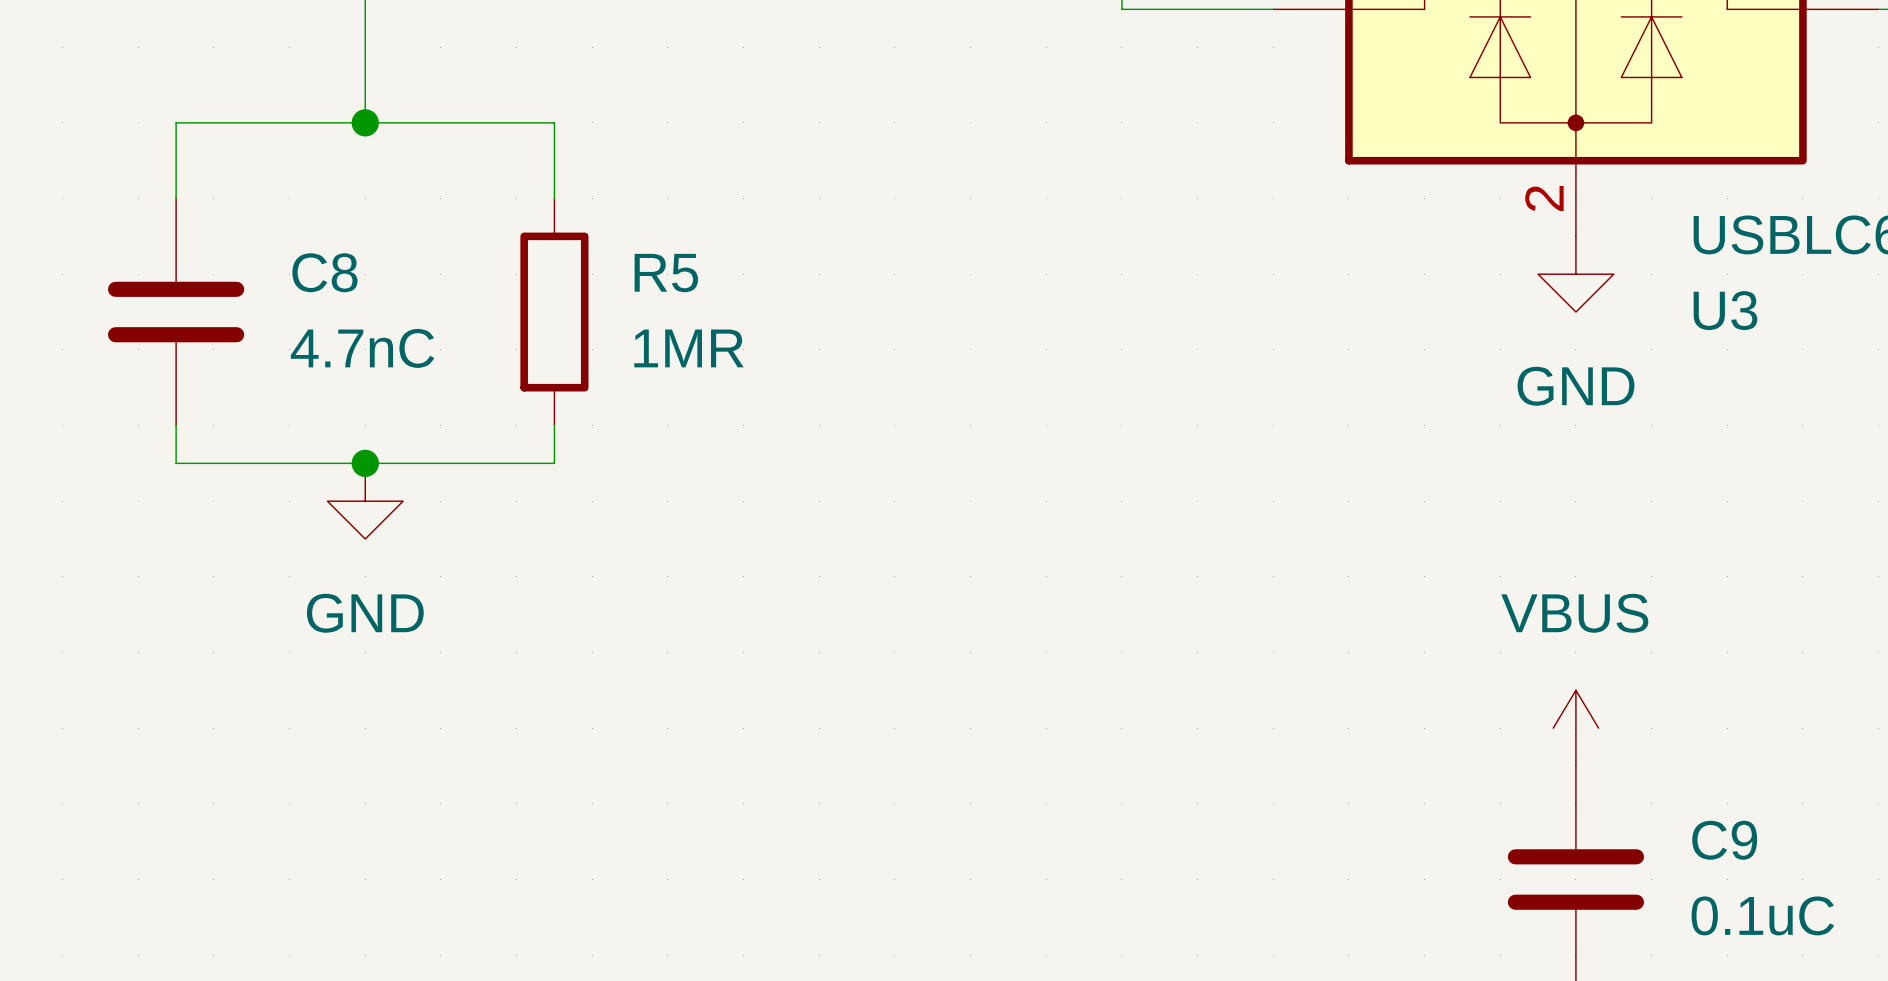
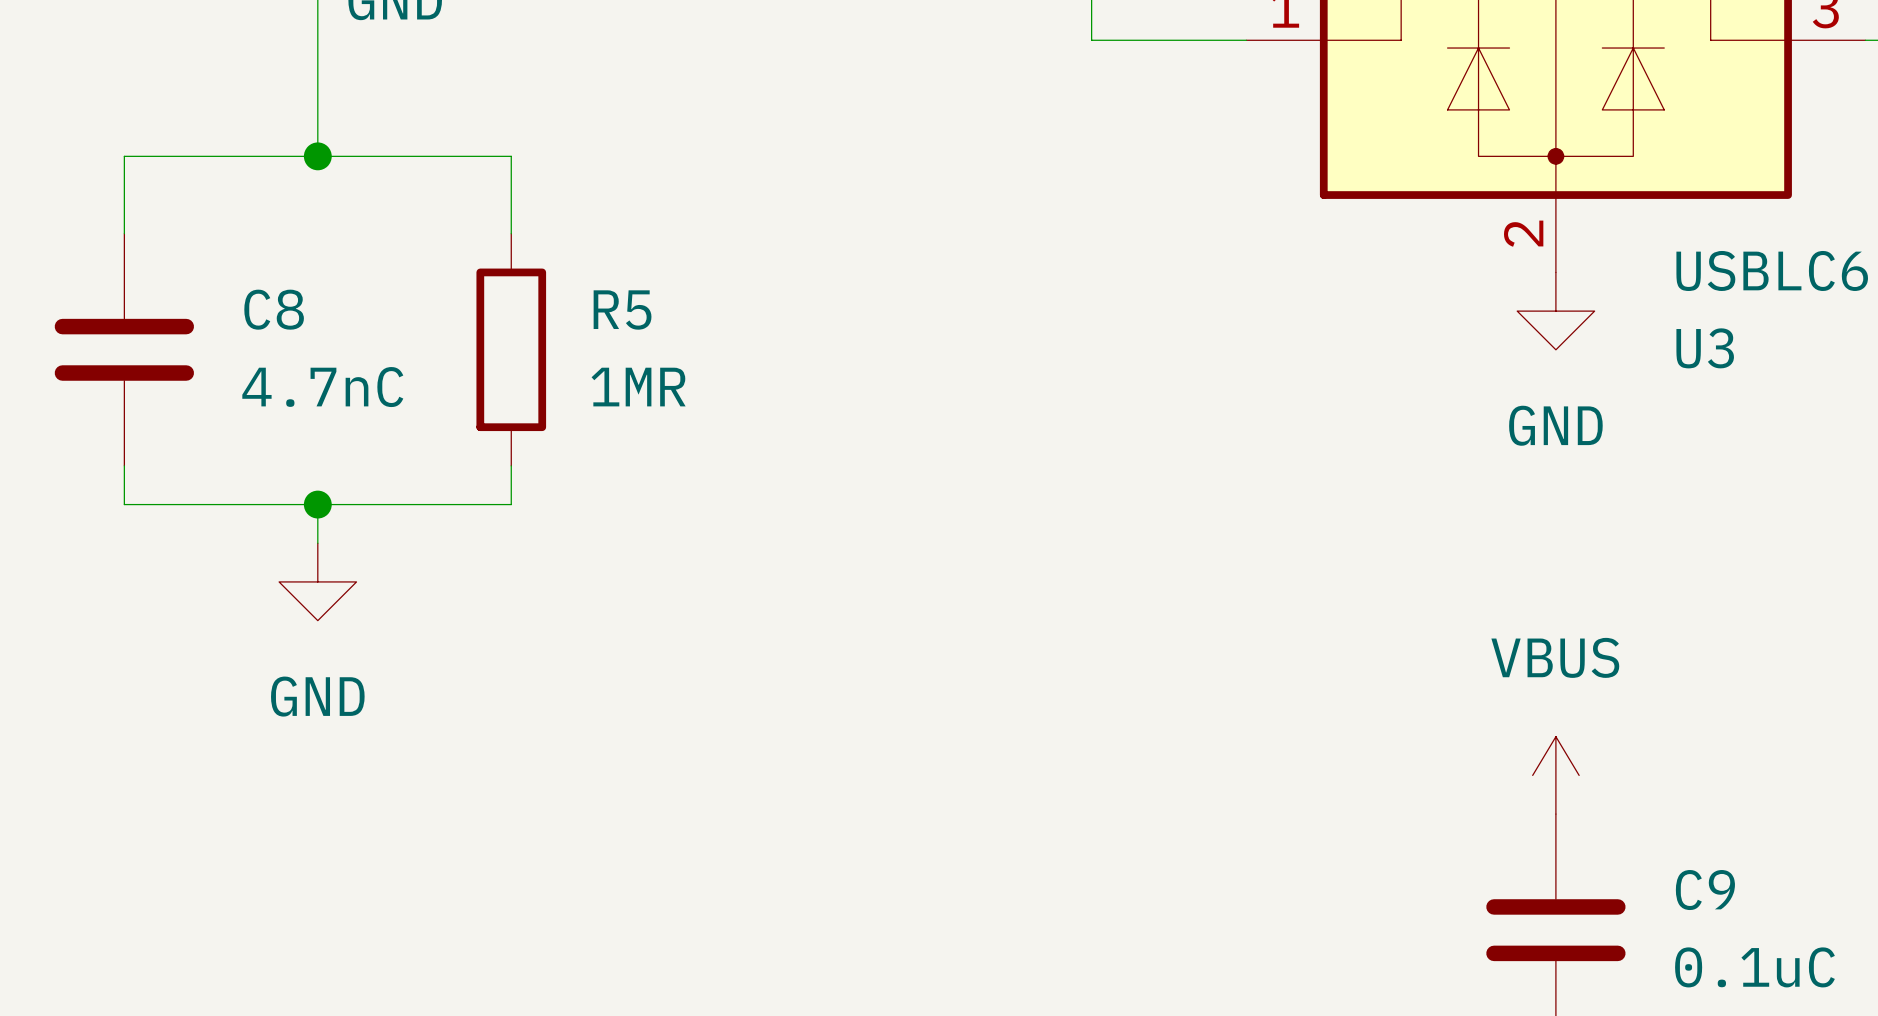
power symbol position: GND (365, 501) -> GND (317, 581)

